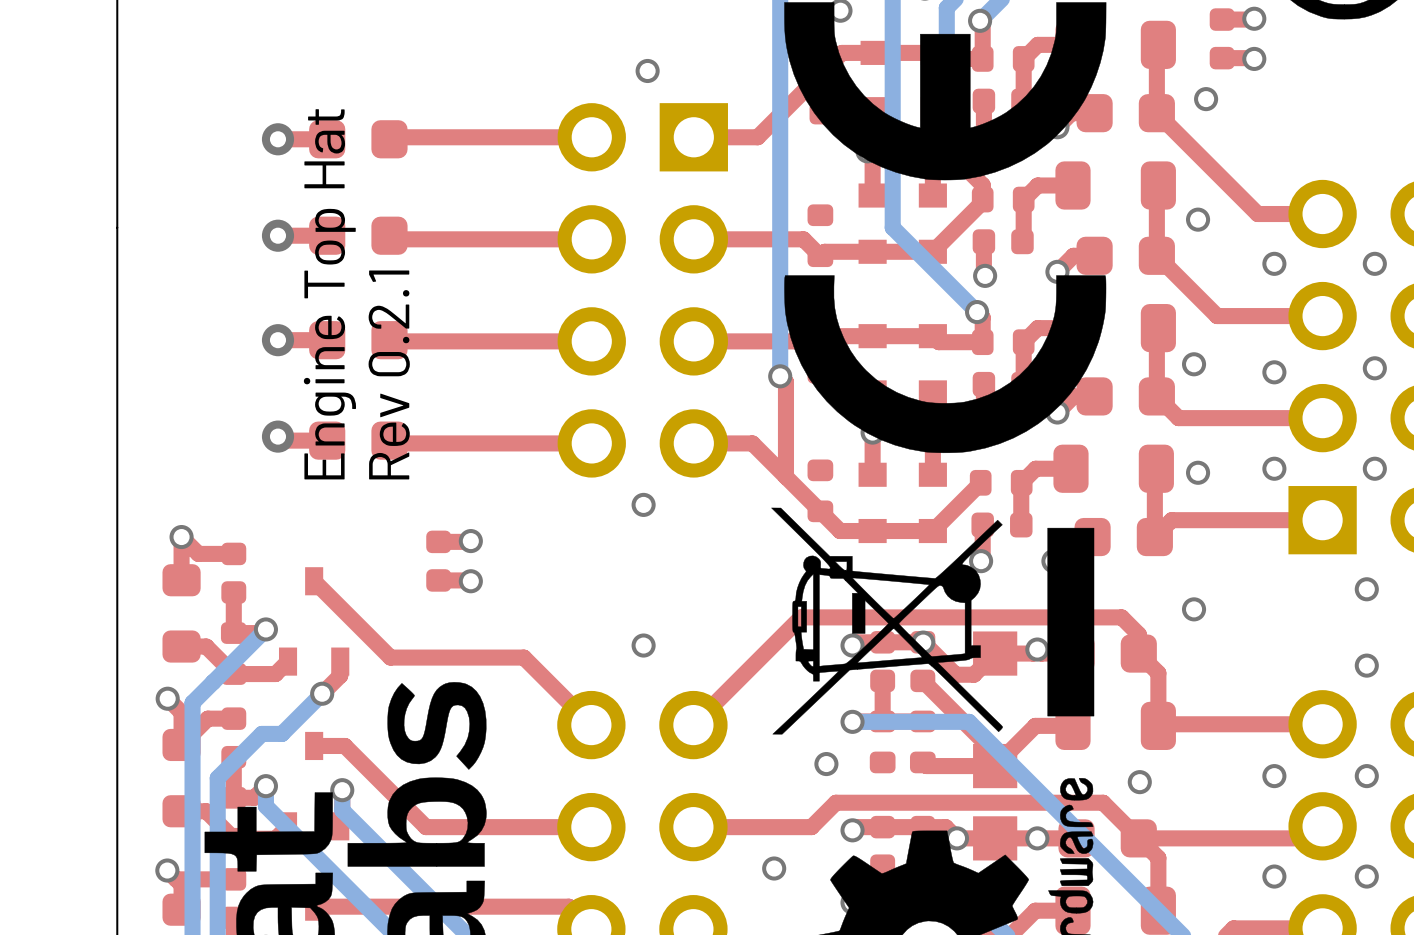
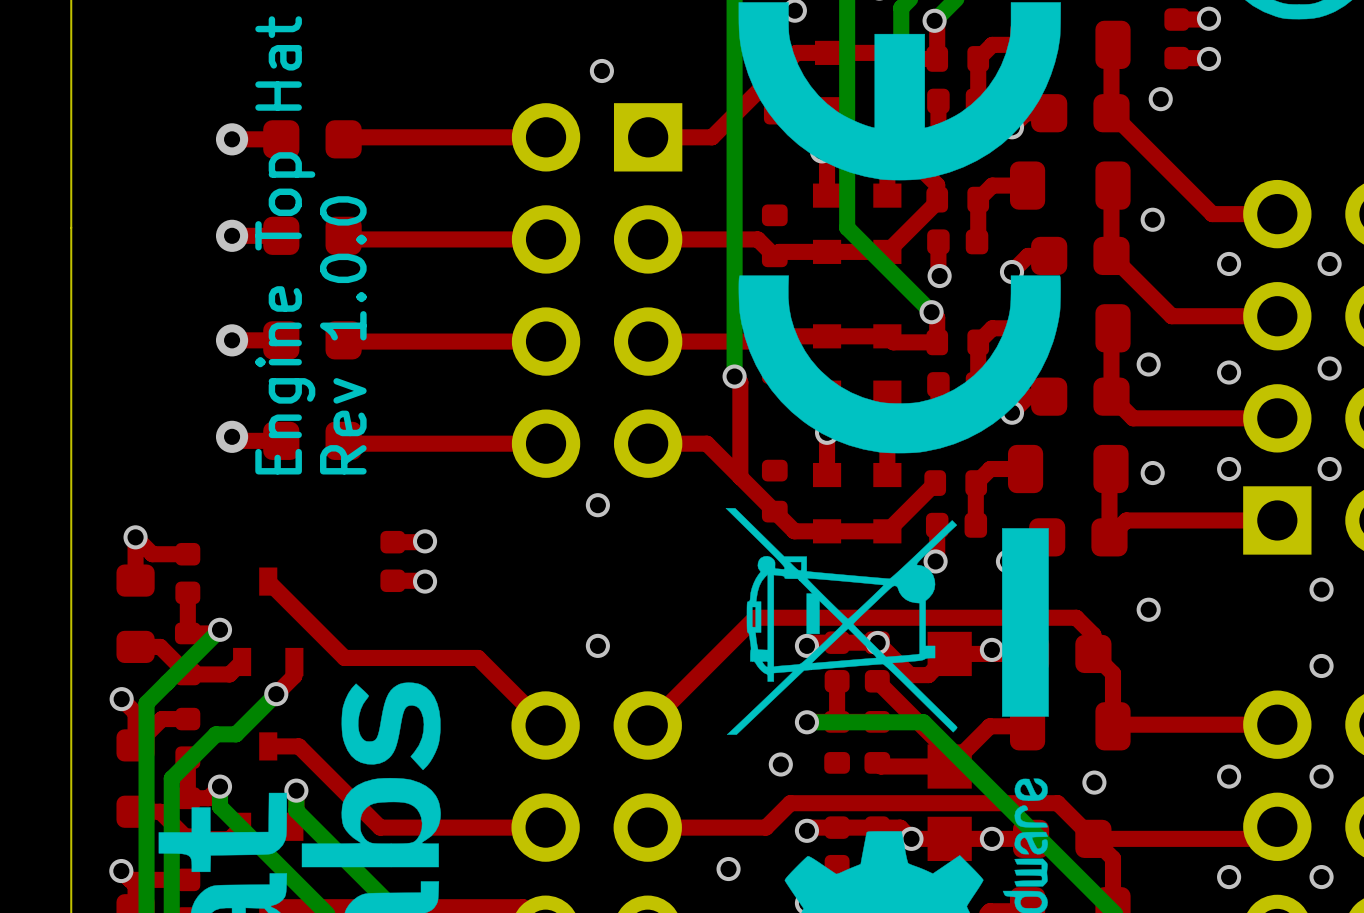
text: Rev 0.2.1 (389, 374) -> Rev 1.0.0 (343, 335)

